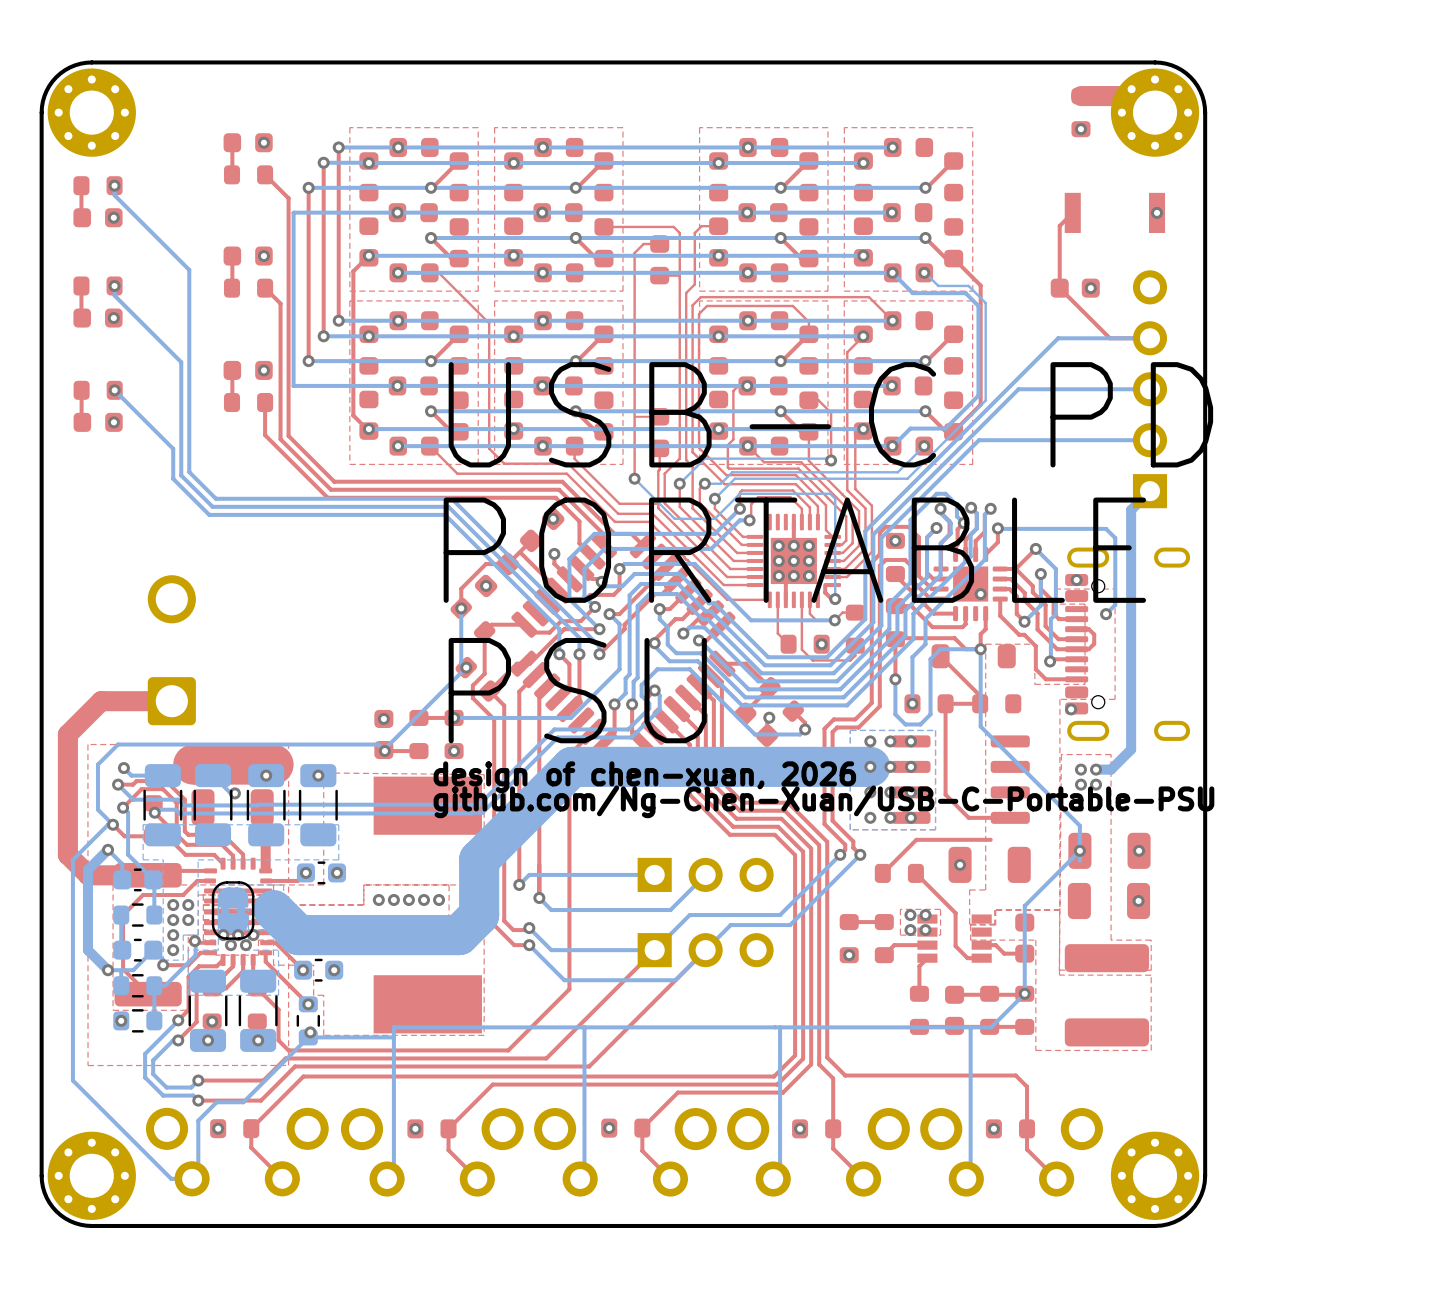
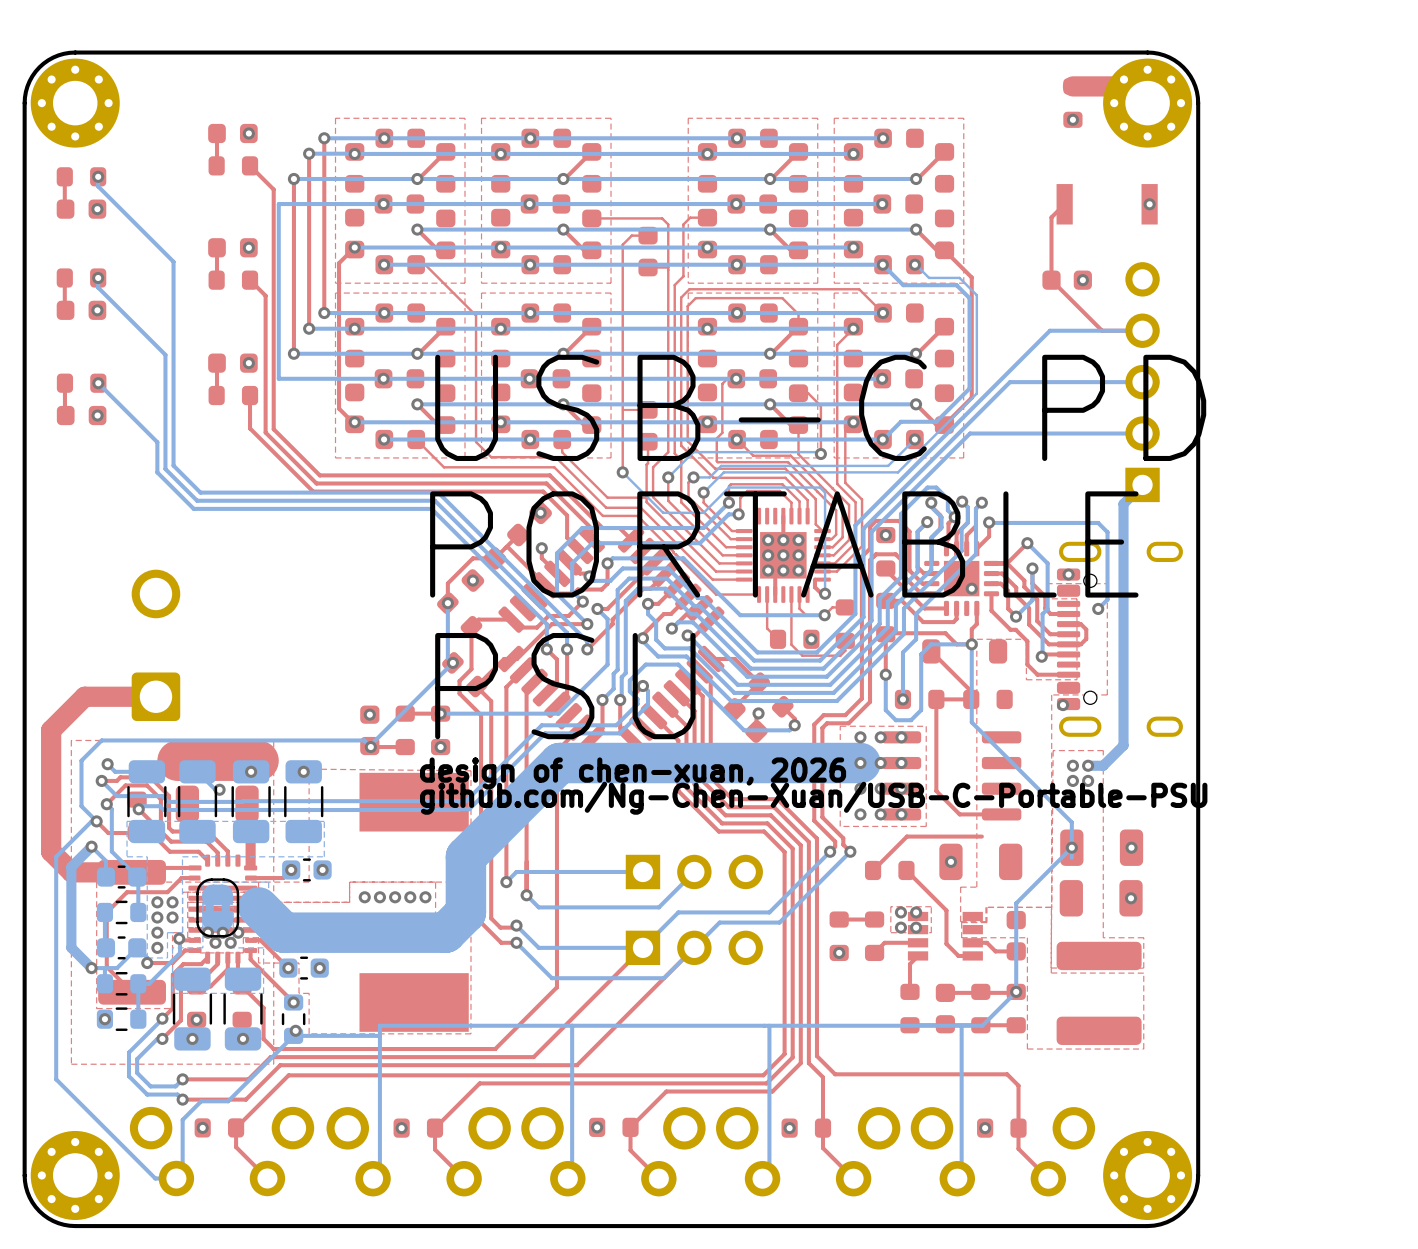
bottom zone outline: (935, 730) (935, 829) (850, 829) (850, 730) (935, 730) -> none

